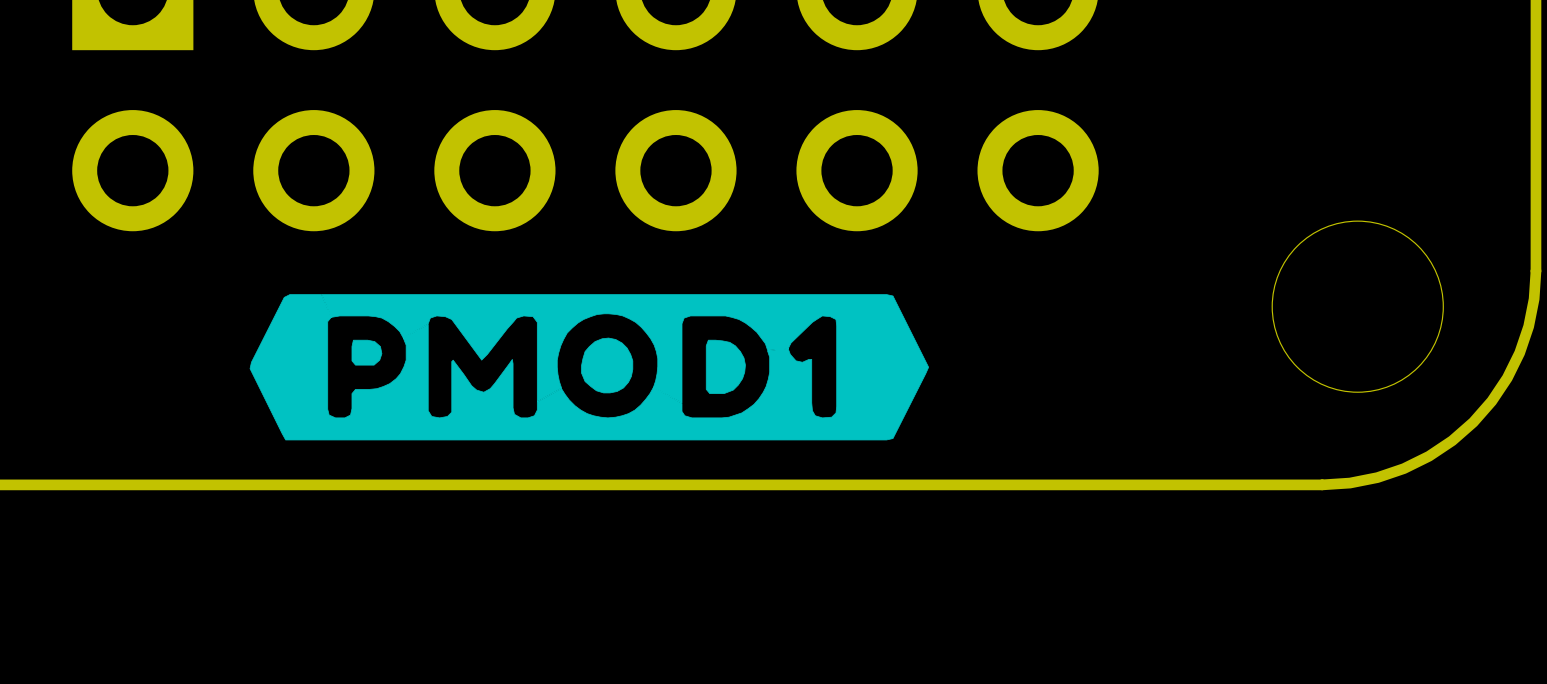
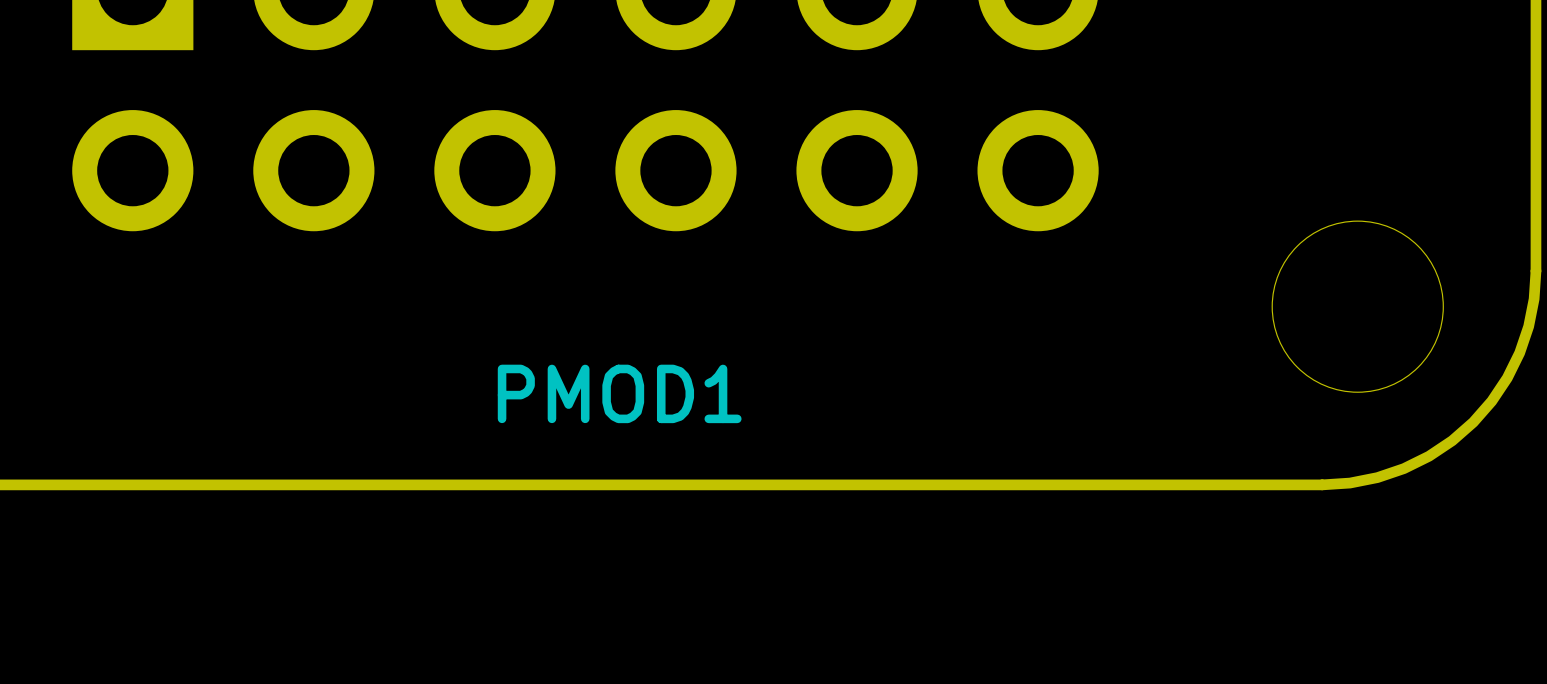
drawing: [249, 294, 930, 441] -> none
text: none -> PMOD1 (619, 393)

